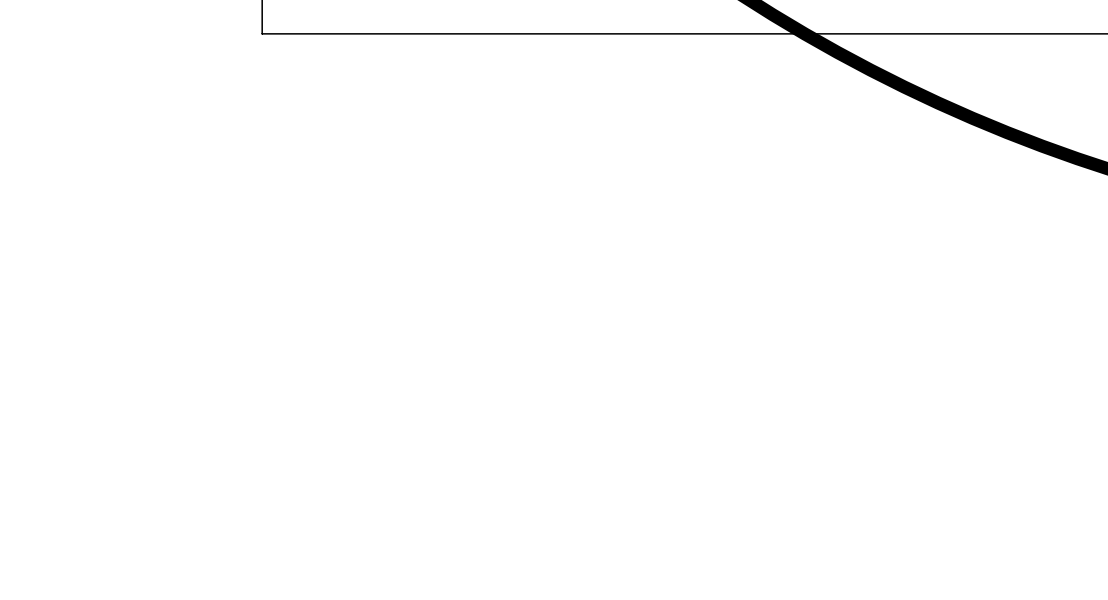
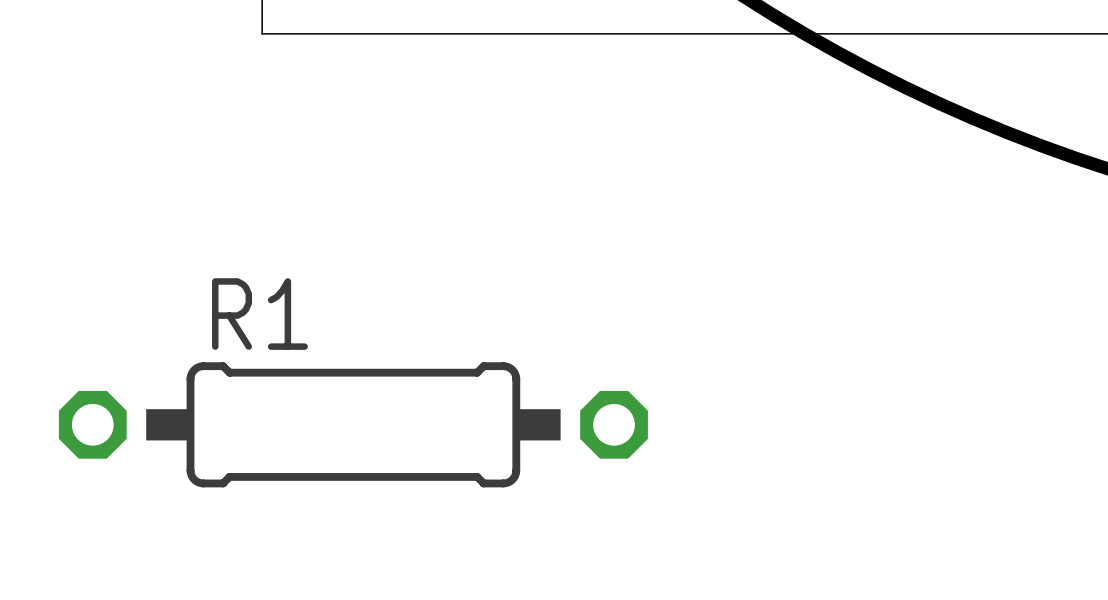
R1: none -> (353, 424)

